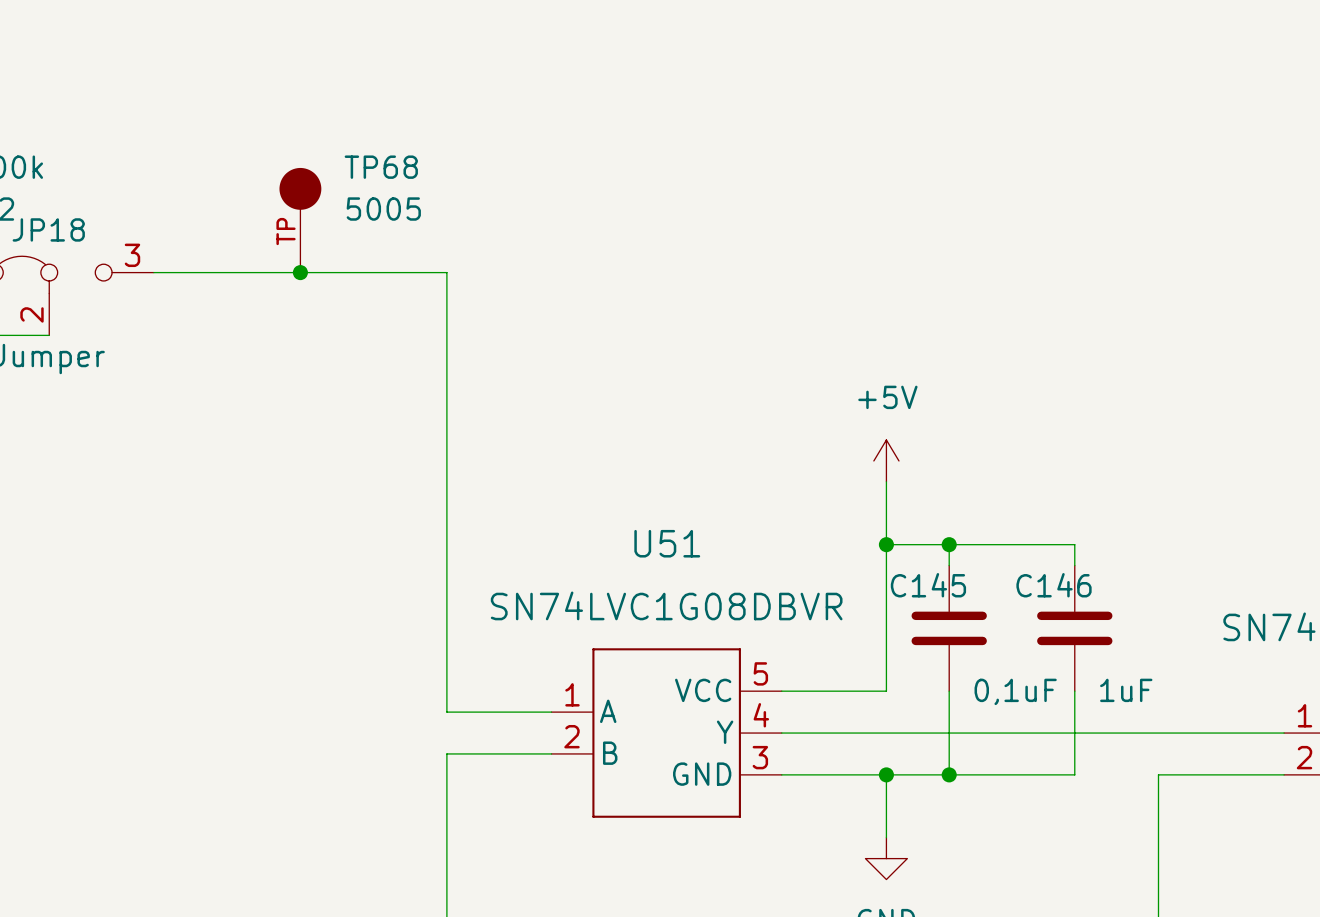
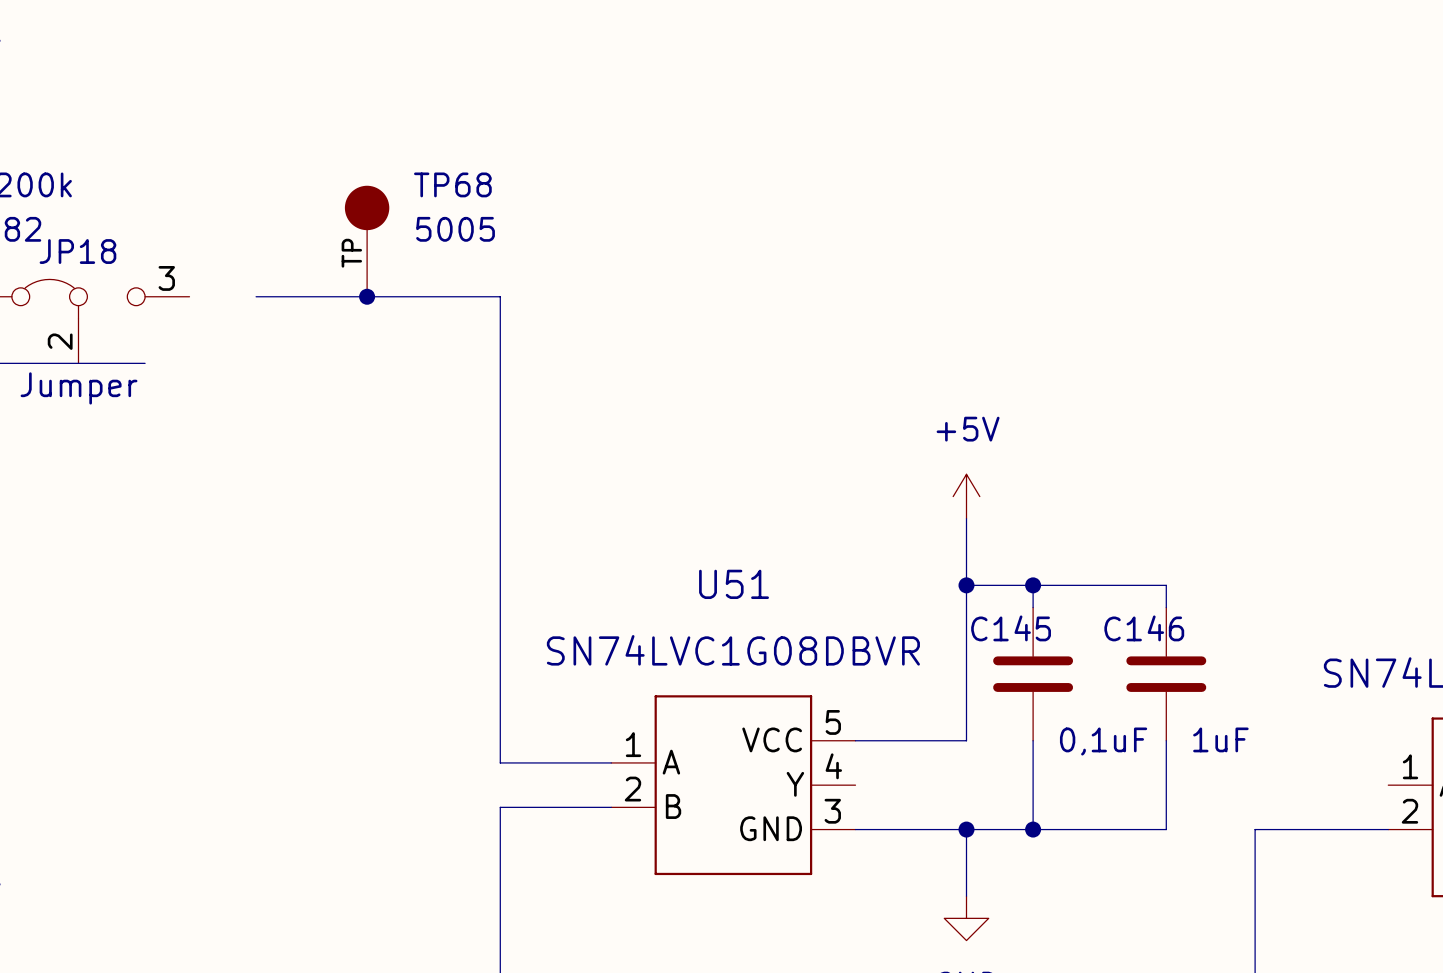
TP68 position: (300, 220) -> (367, 241)
wire: (153, 272) (216, 272) -> (78, 363) (145, 363)
junction position: (300, 272) -> (367, 296)
wire: (781, 733) (1284, 733) -> none

